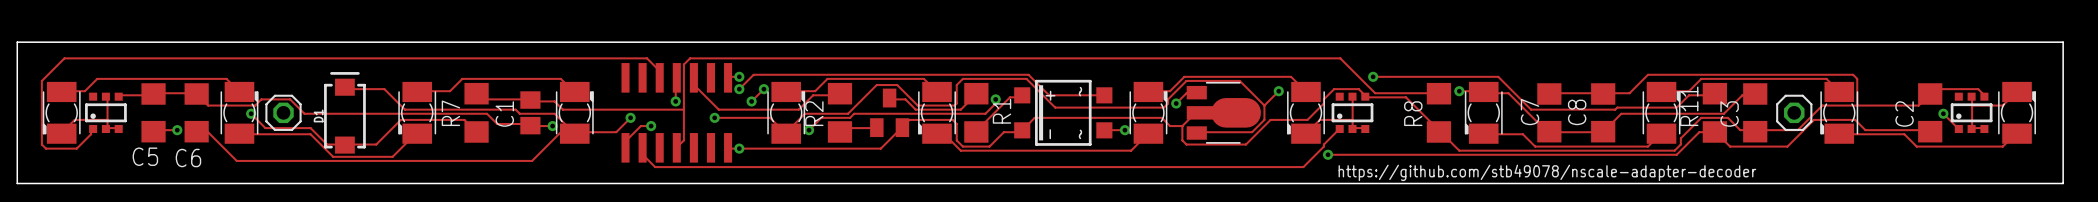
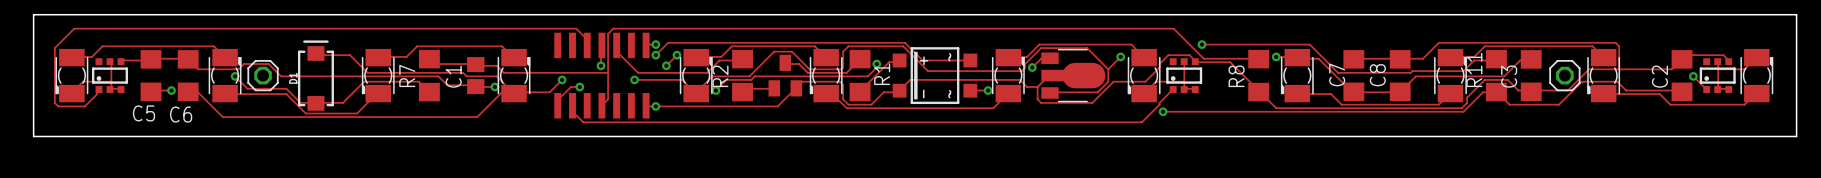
text: https://github.com/stb49078/nscale-adapter-decoder (1547, 172) -> none

